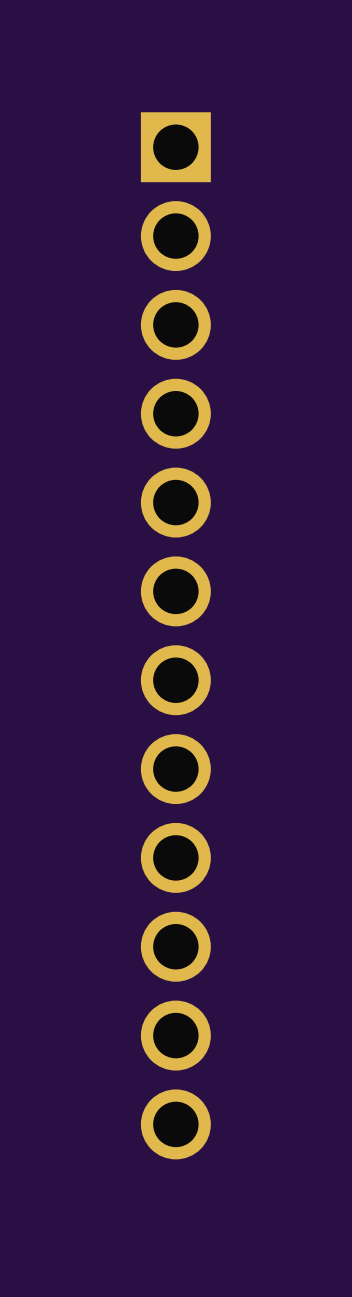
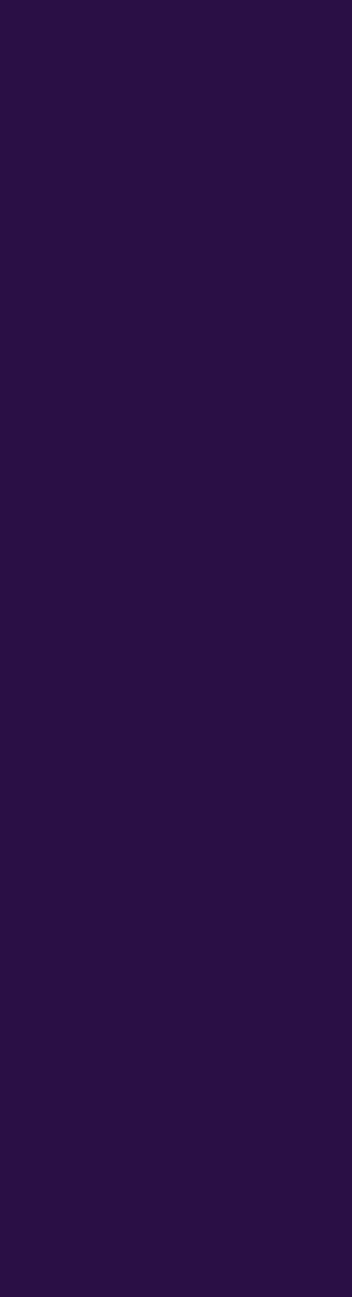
part: (175, 635) -> none

